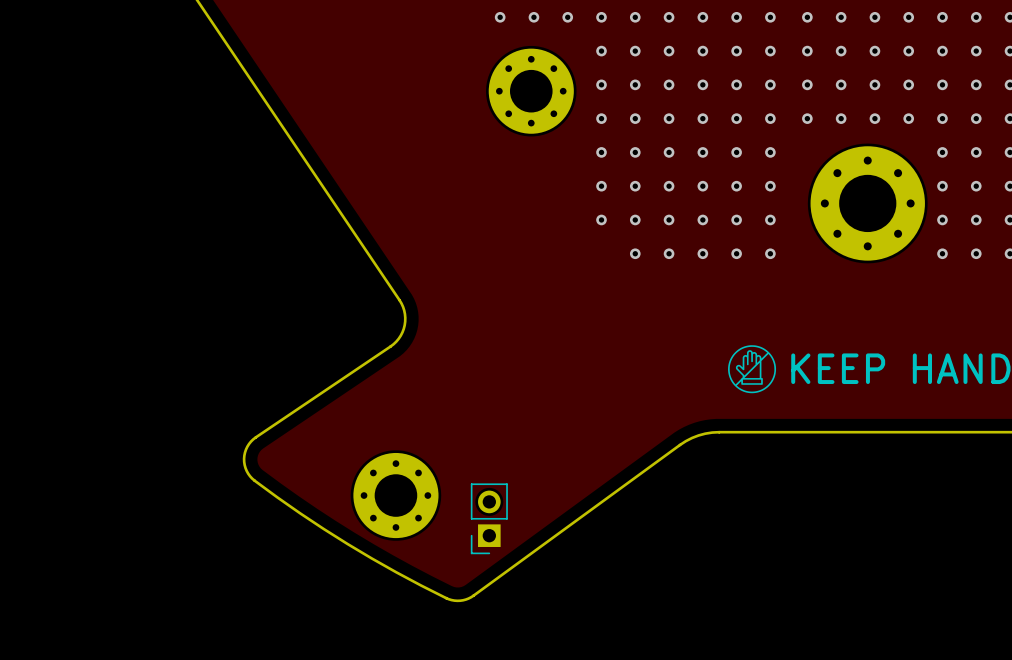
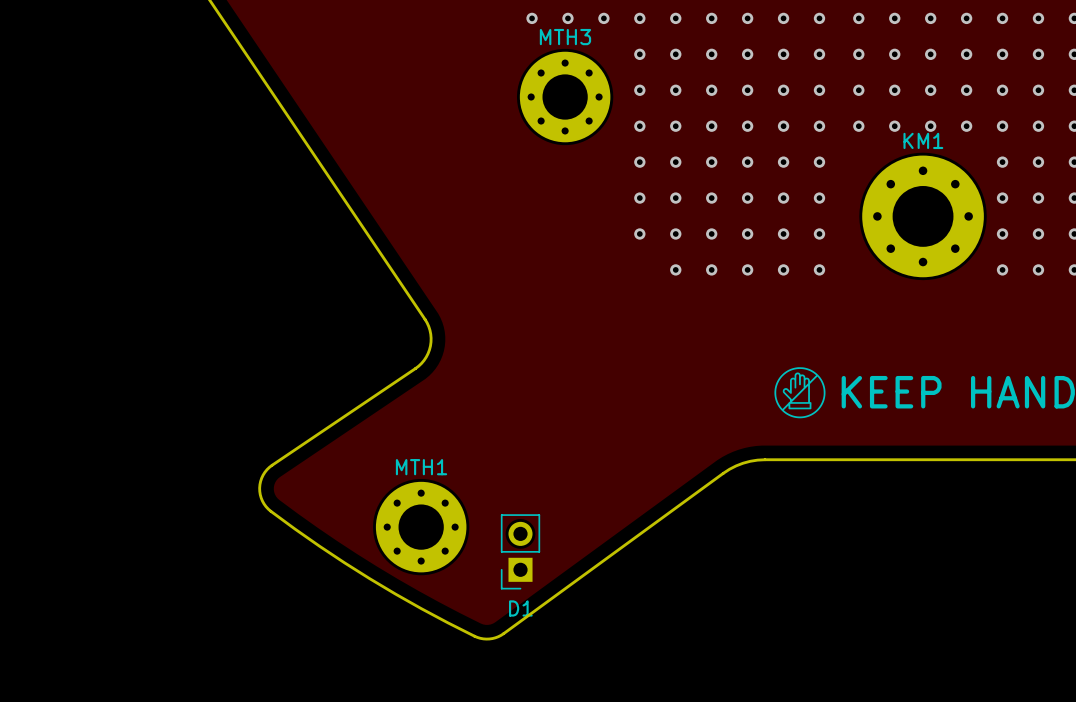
MTH3 name: none -> MTH3 (565, 37)
KM1 name: none -> KM1 (923, 140)
MTH1 name: none -> MTH1 (421, 467)
D1 name: none -> D1 (520, 608)

